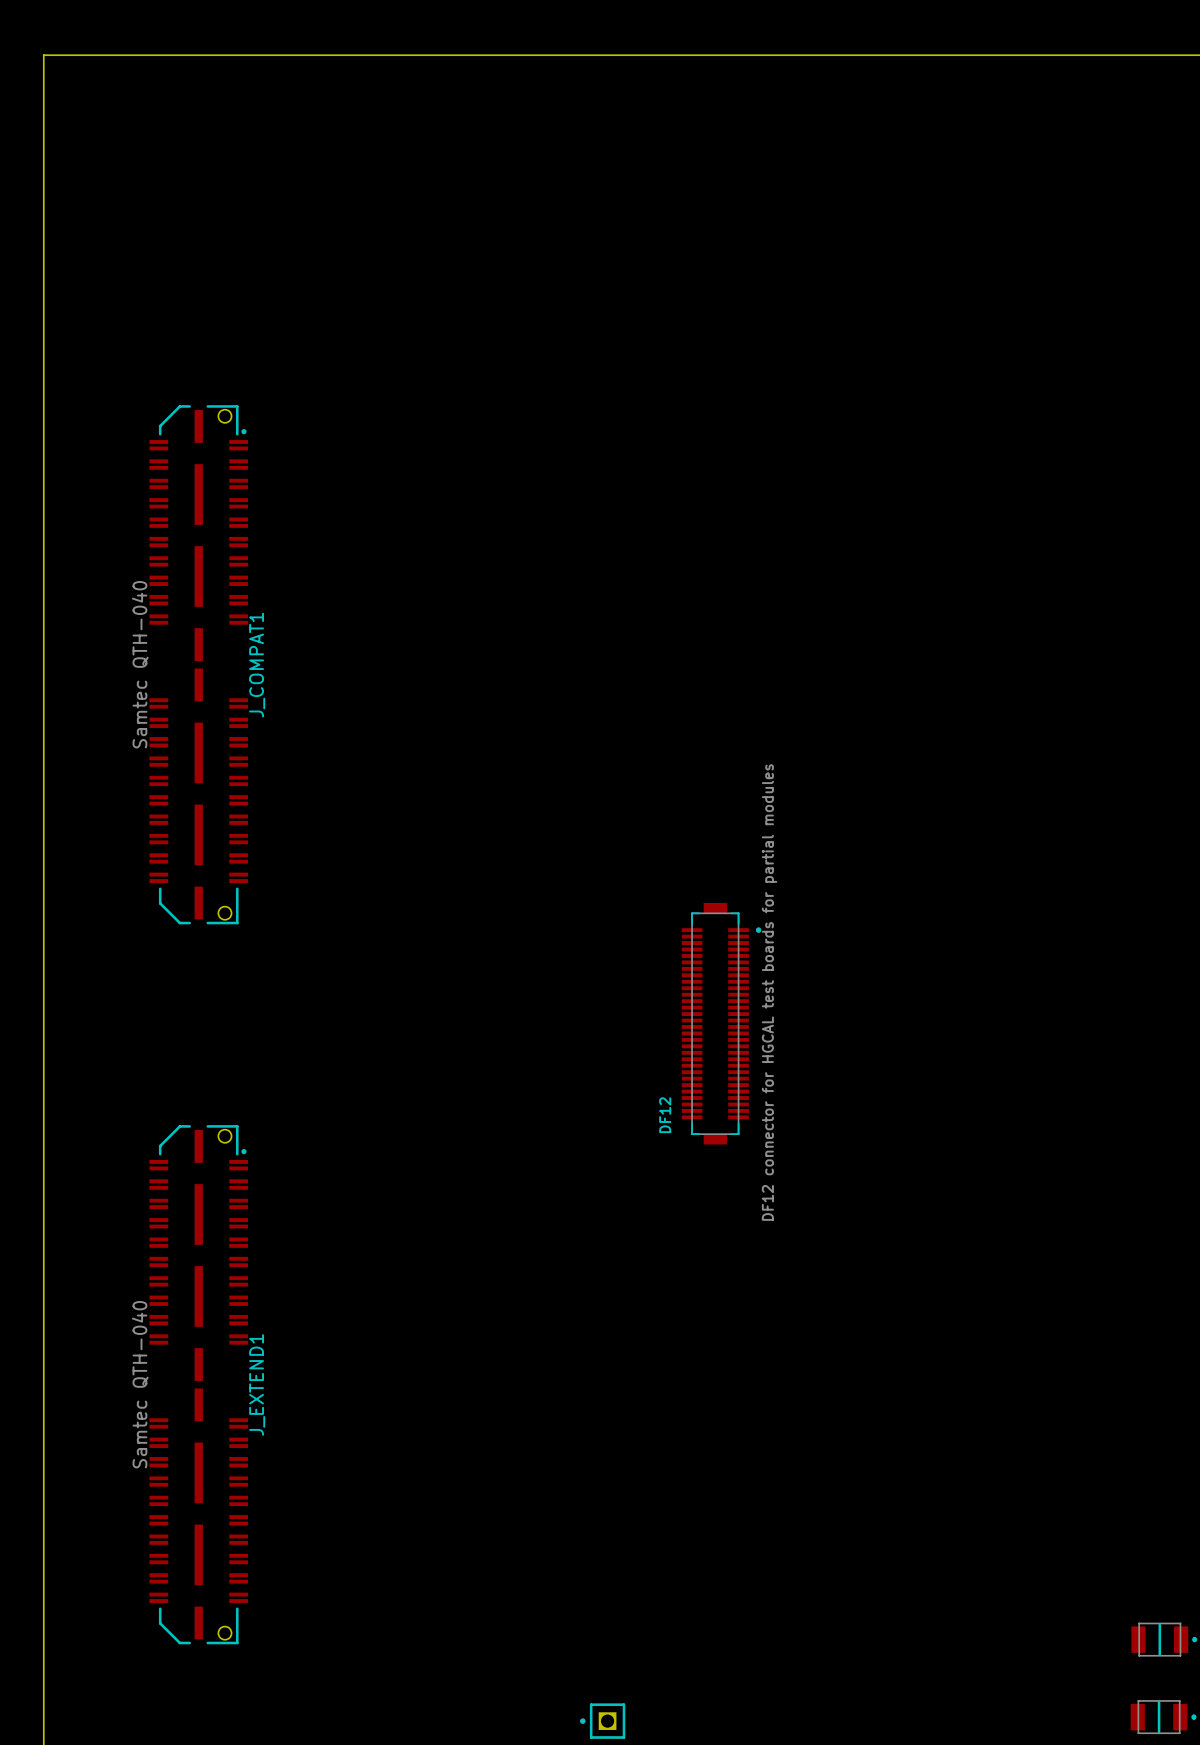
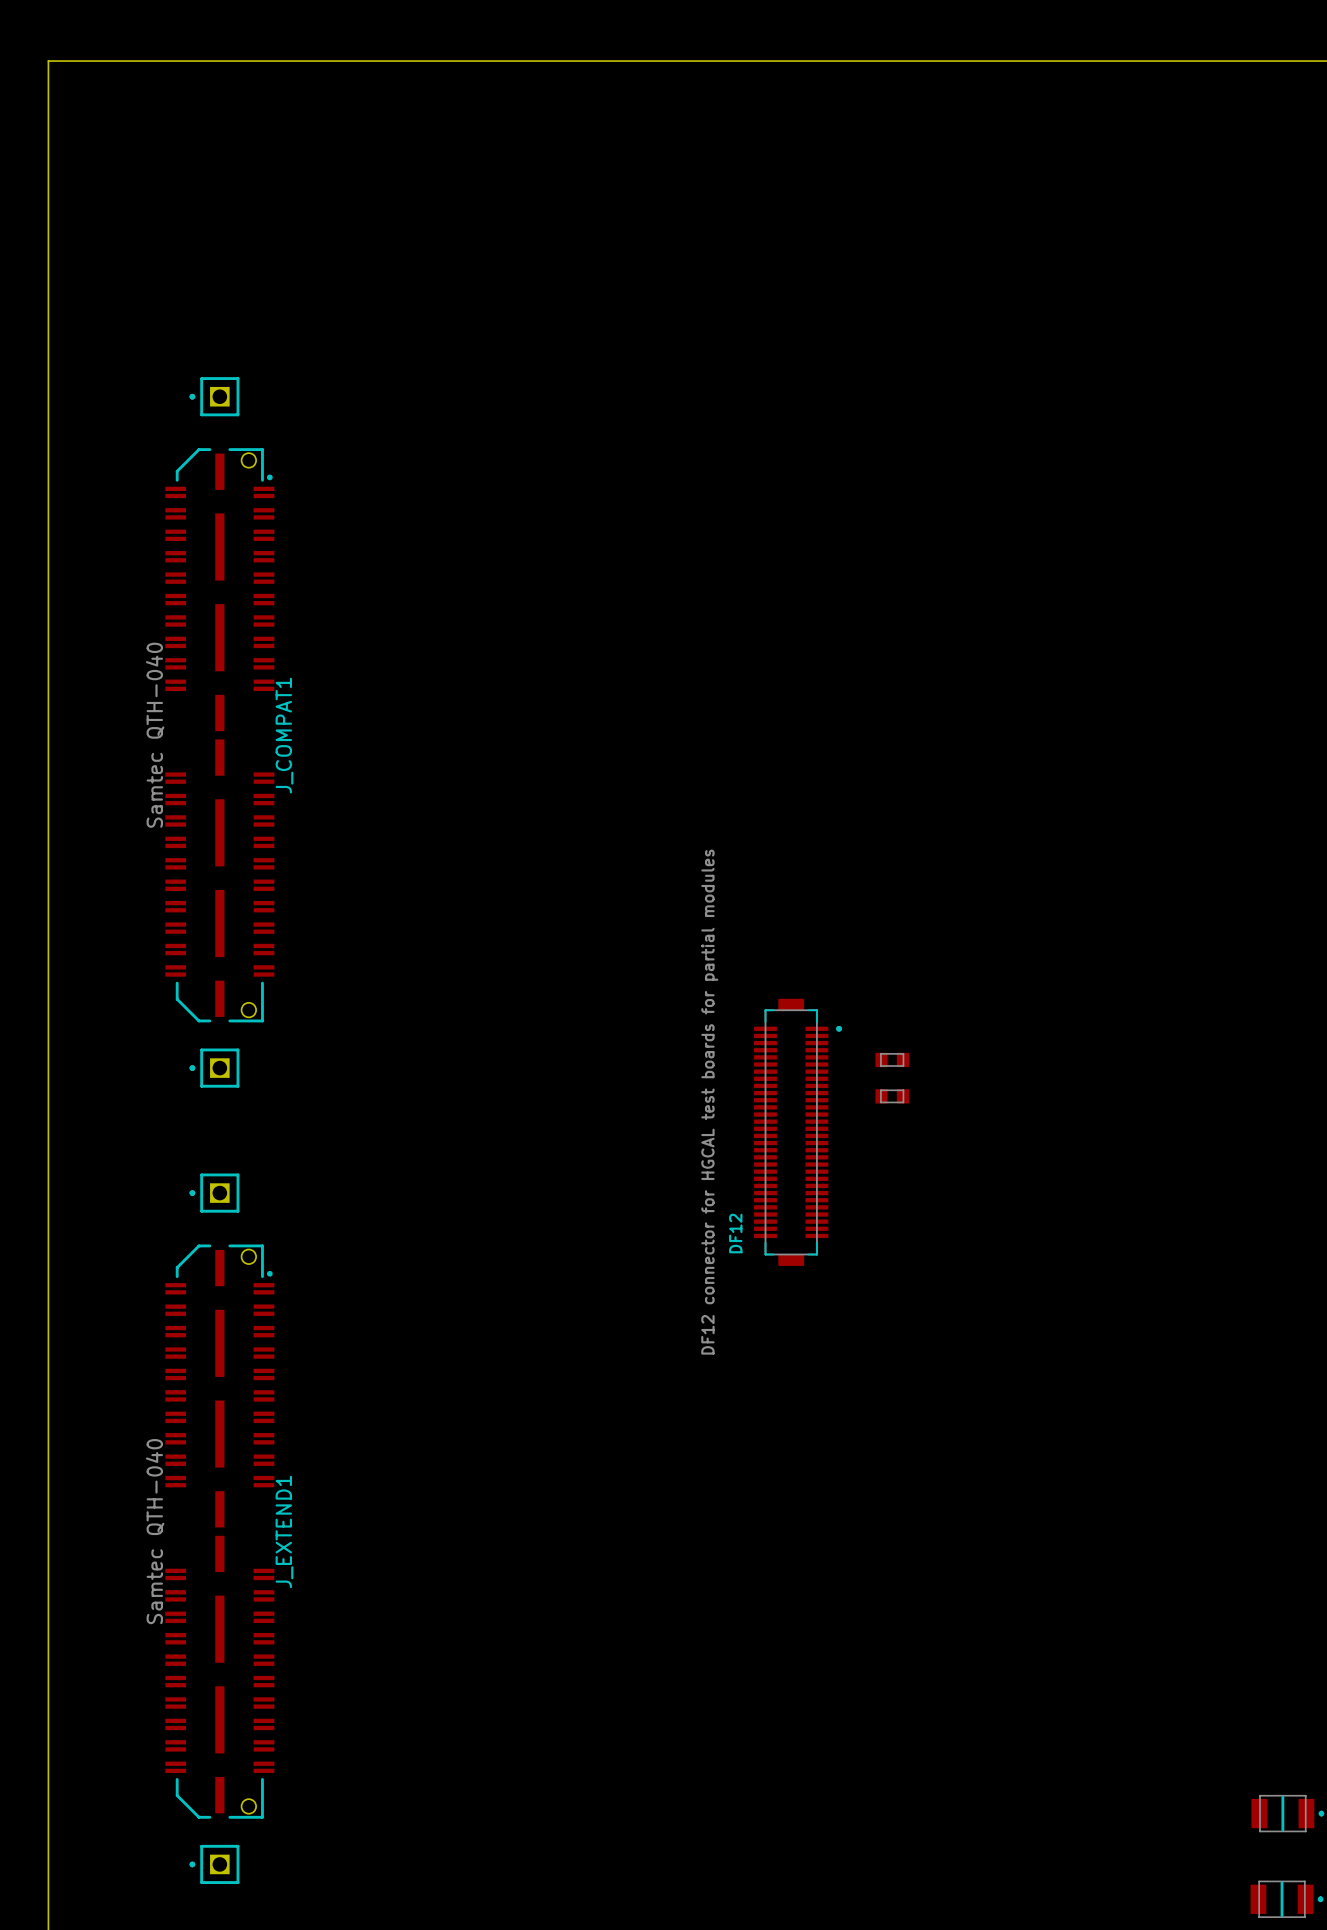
part: none -> (214, 396)
part: none -> (892, 1059)
part: none -> (214, 1068)
part: none -> (892, 1096)
DF12 value position: DF12 connector for HGCAL test boards for partial modules (769, 992) -> DF12 connector for HGCAL test boards for partial modules (709, 1102)
part: none -> (214, 1193)
part: none -> (214, 1864)
part: (602, 1721) -> none

